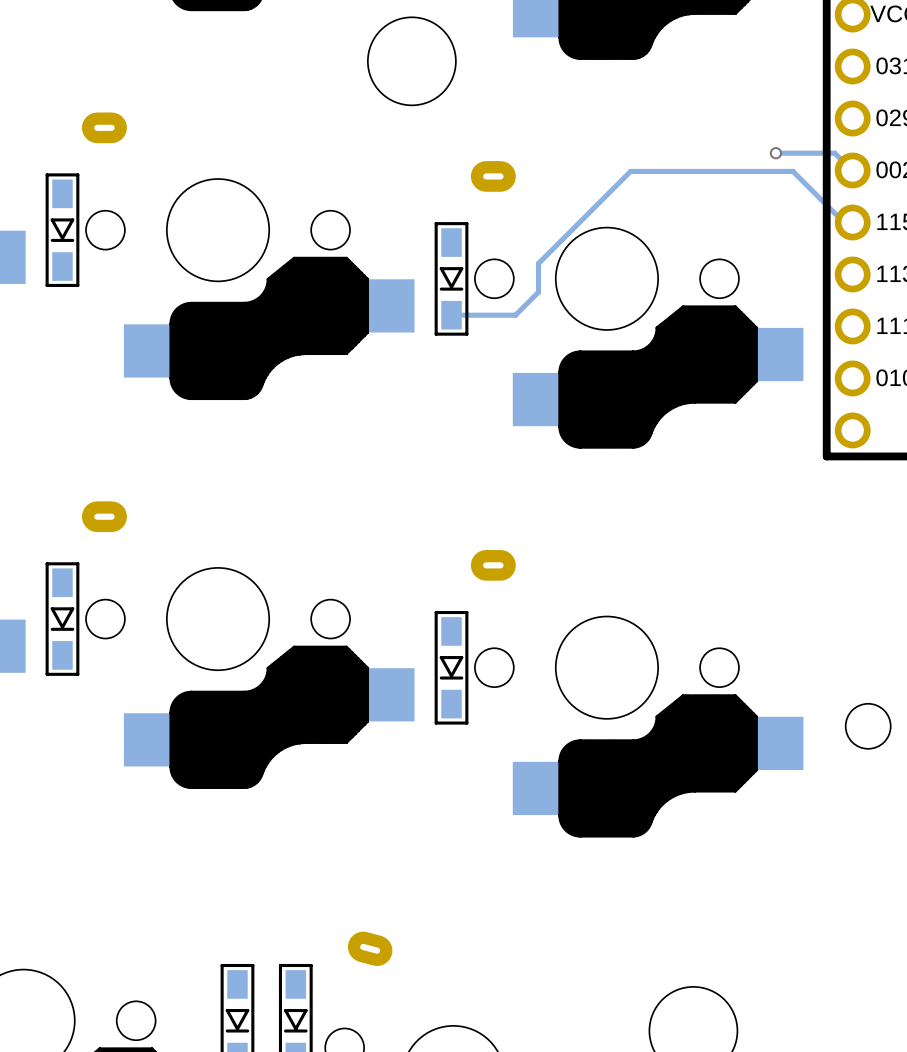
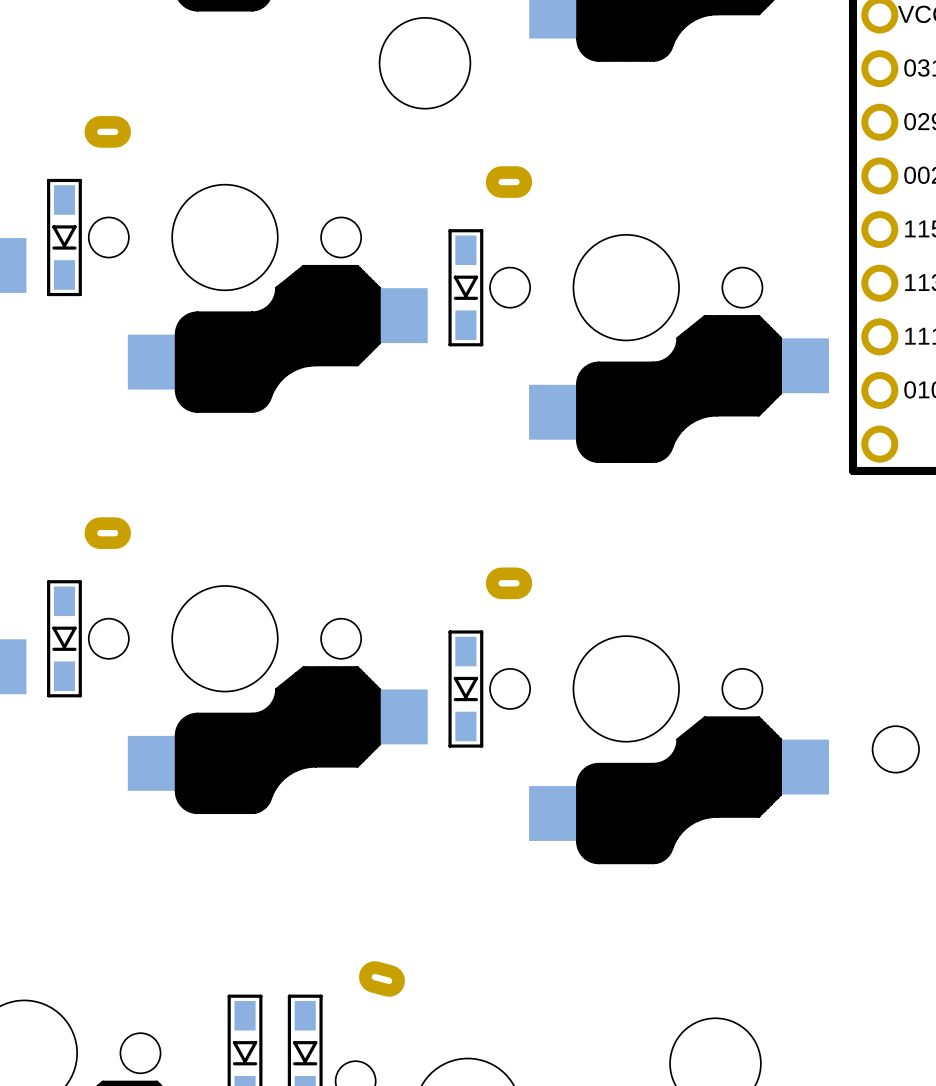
track: (775, 153) (834, 153) (852, 171) -> none
via: (775, 153) -> none
track: (852, 223) (844, 223) (792, 171) (630, 171) (538, 263) (538, 292) (515, 315) (451, 315) -> none

